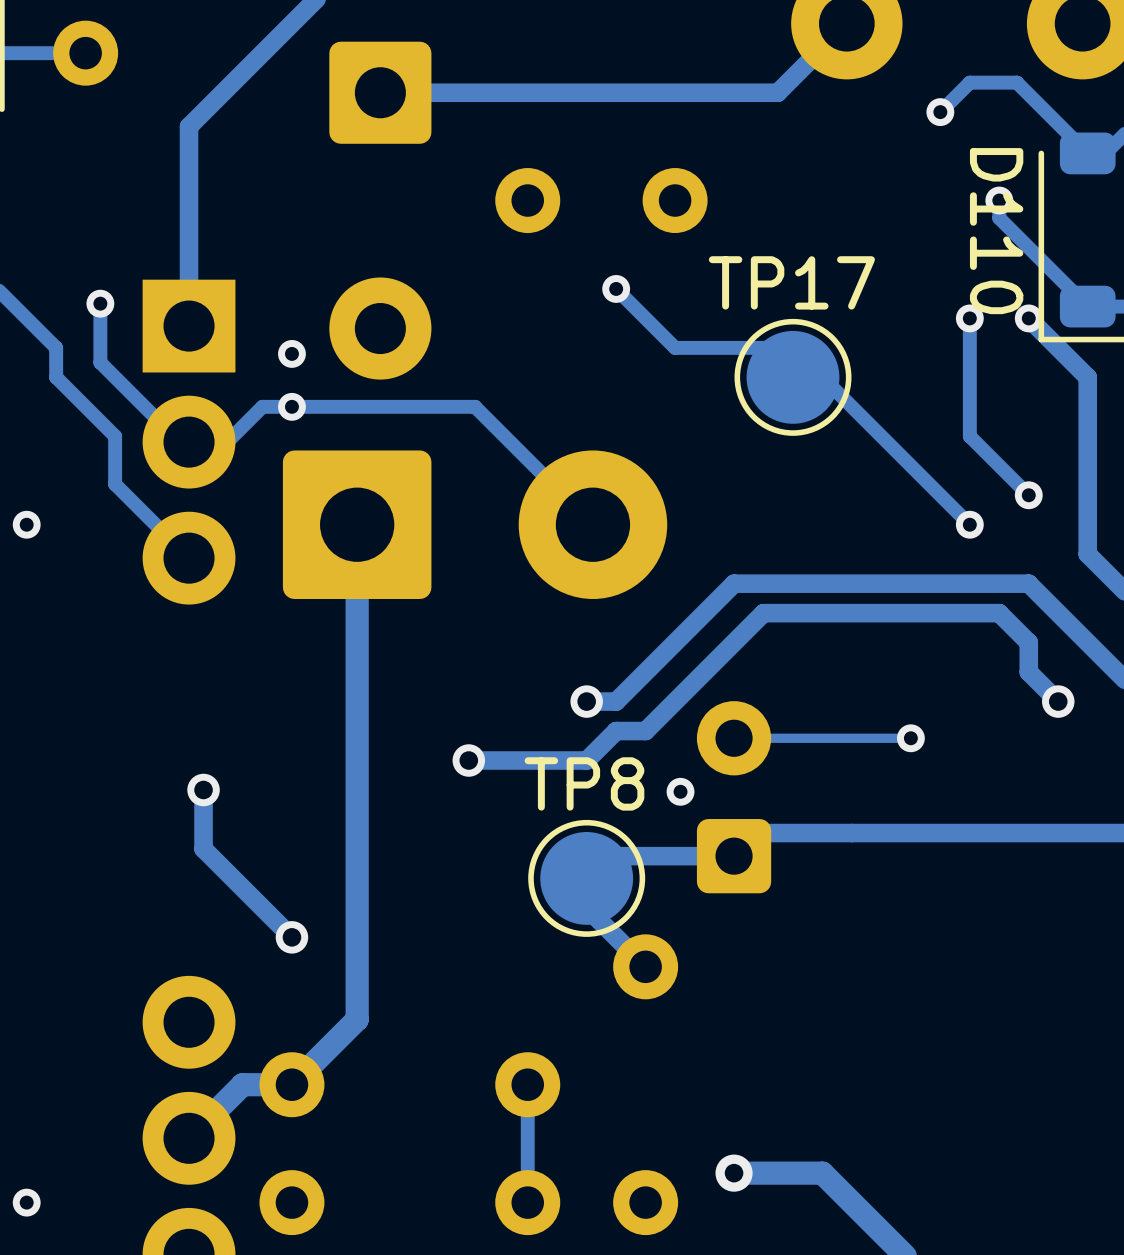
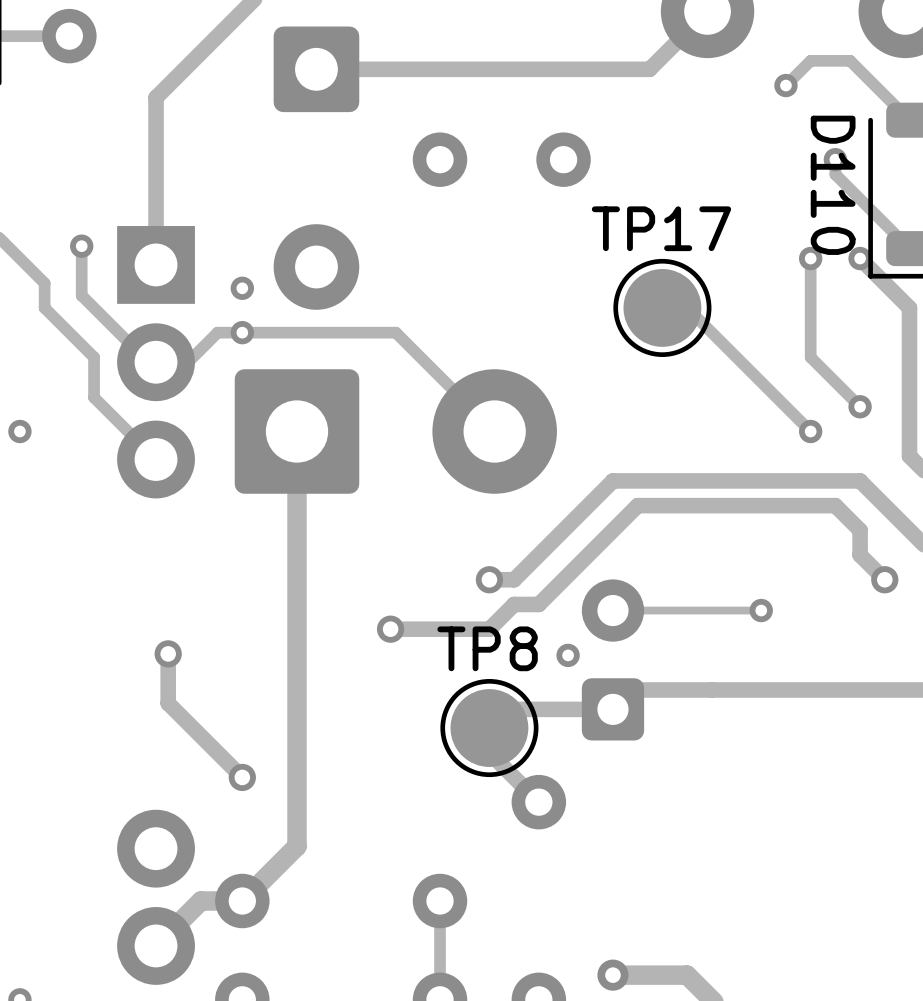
track: (616, 288) (675, 347) (763, 347) (793, 377) -> none
via: (616, 288) -> none

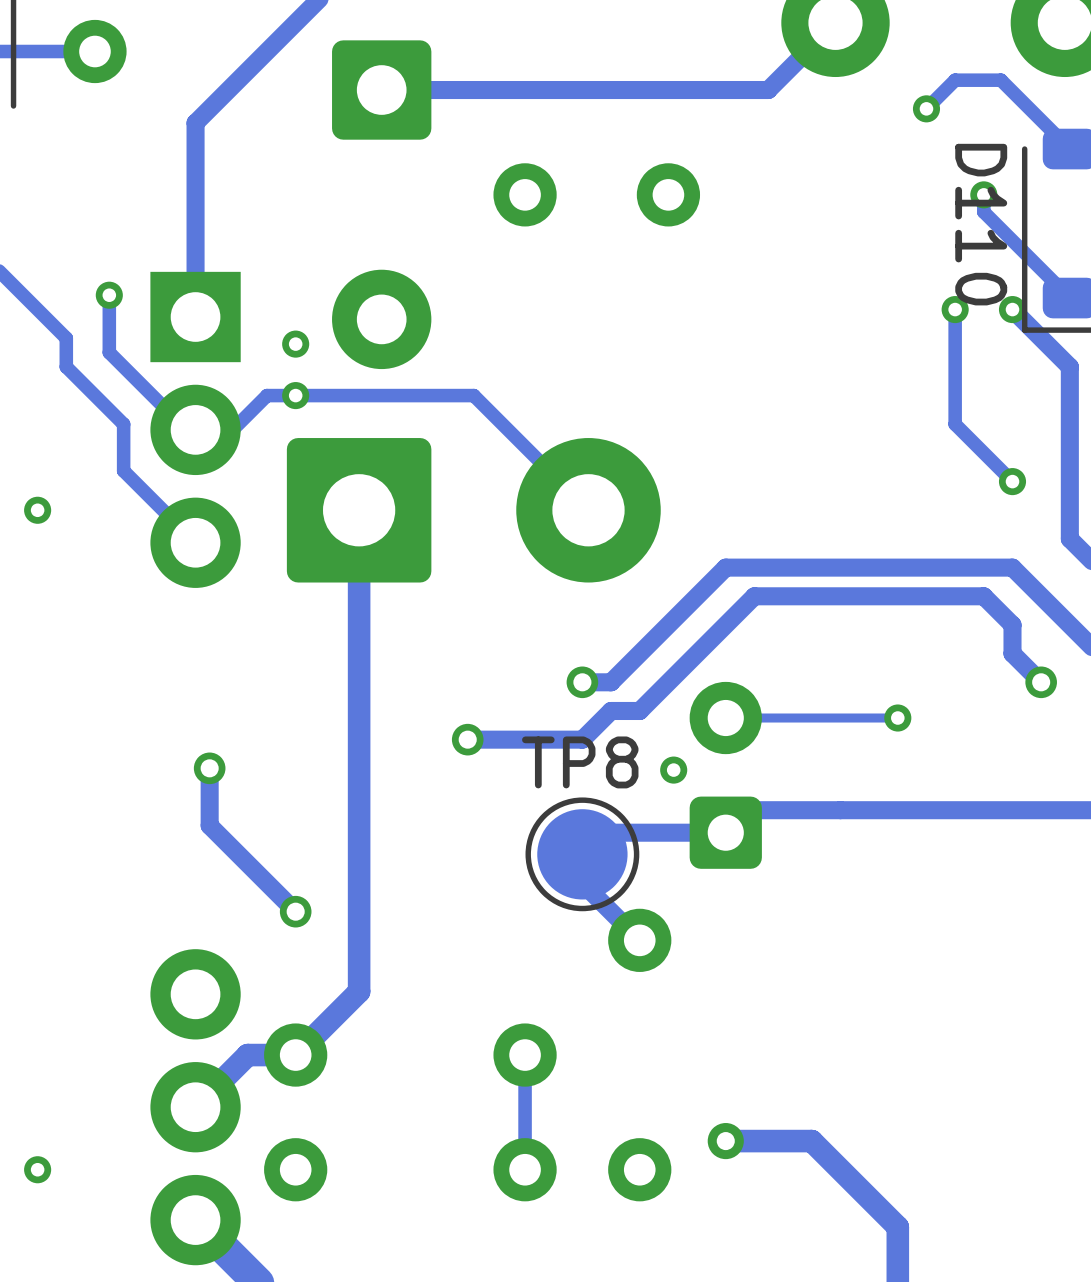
track: (662, 307) (687, 307) (810, 431) -> none
TP17: (662, 307) -> none
via: (810, 431) -> none

